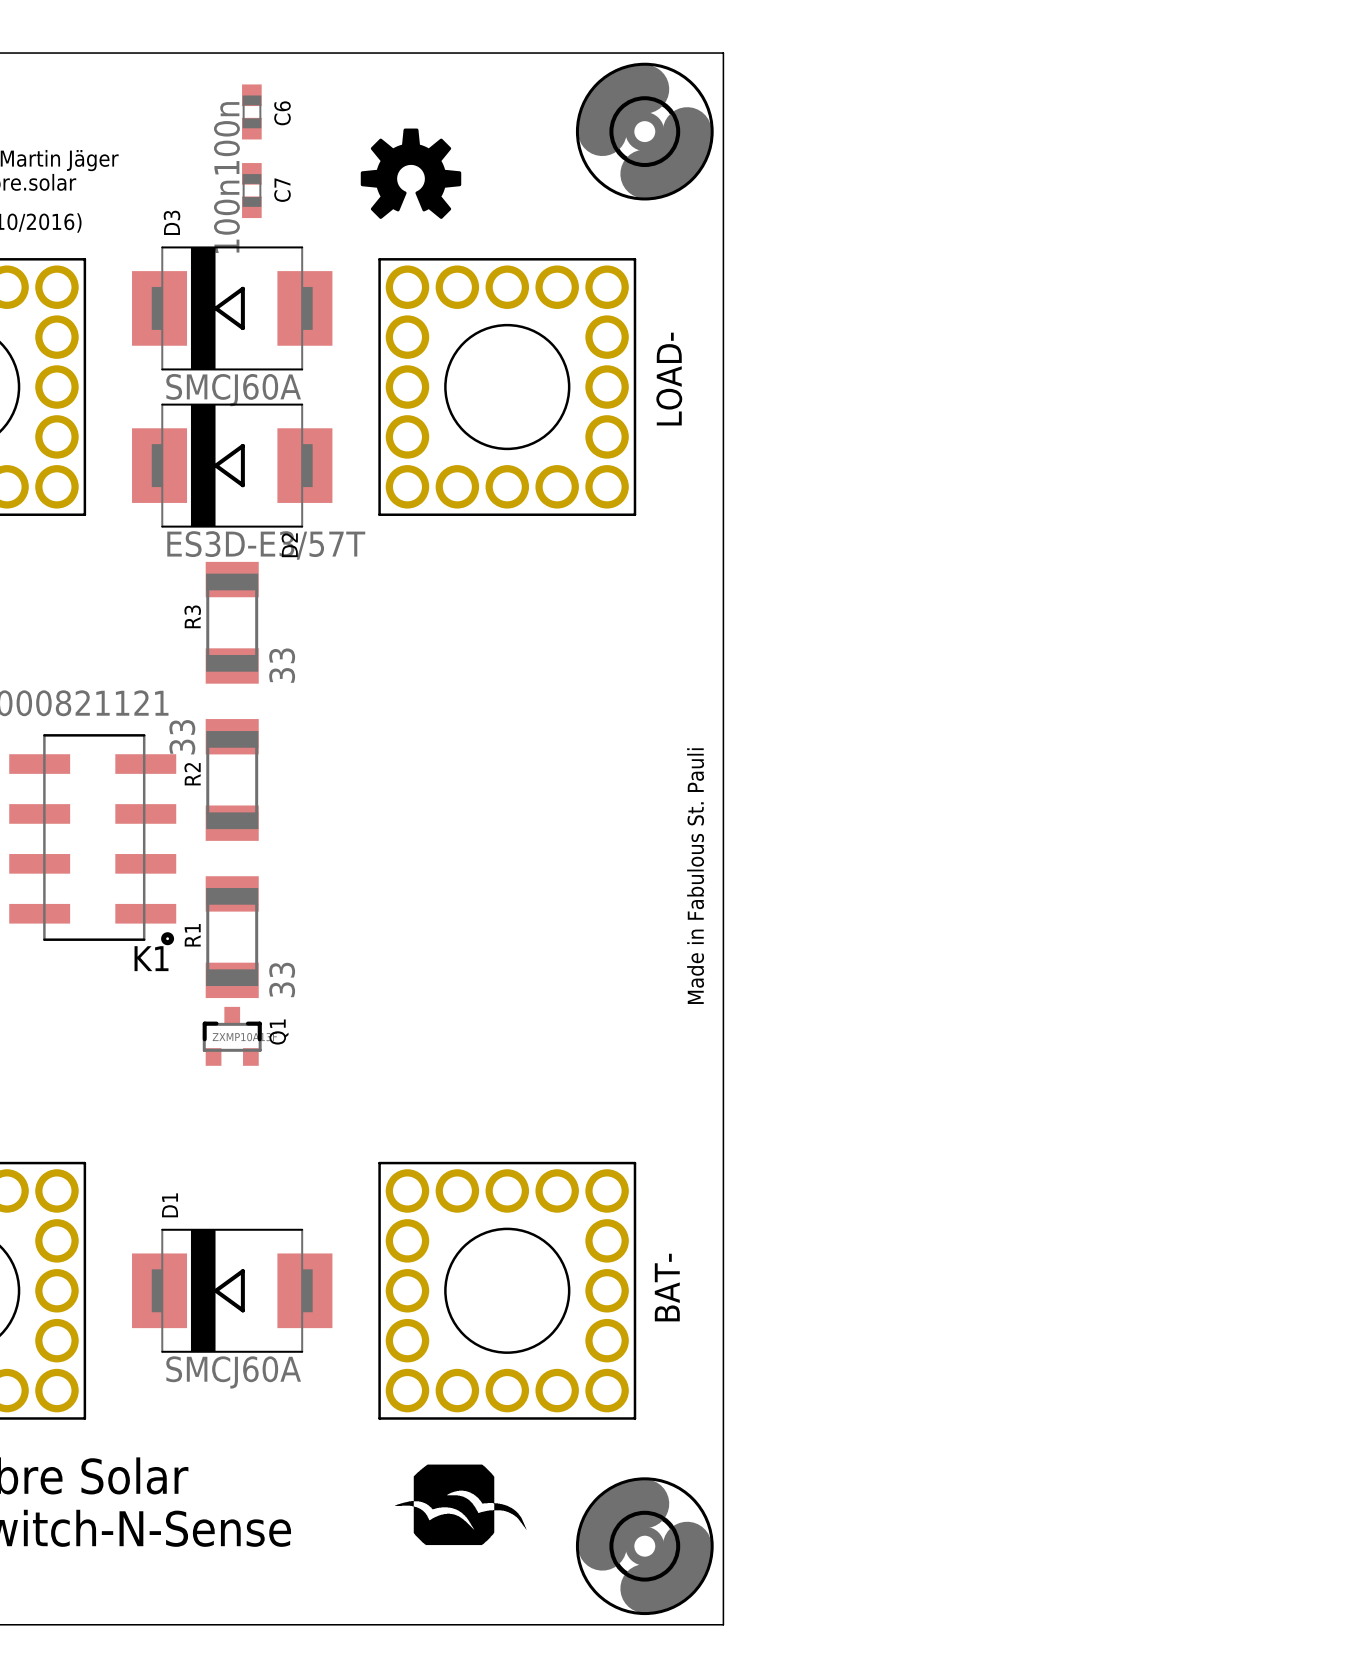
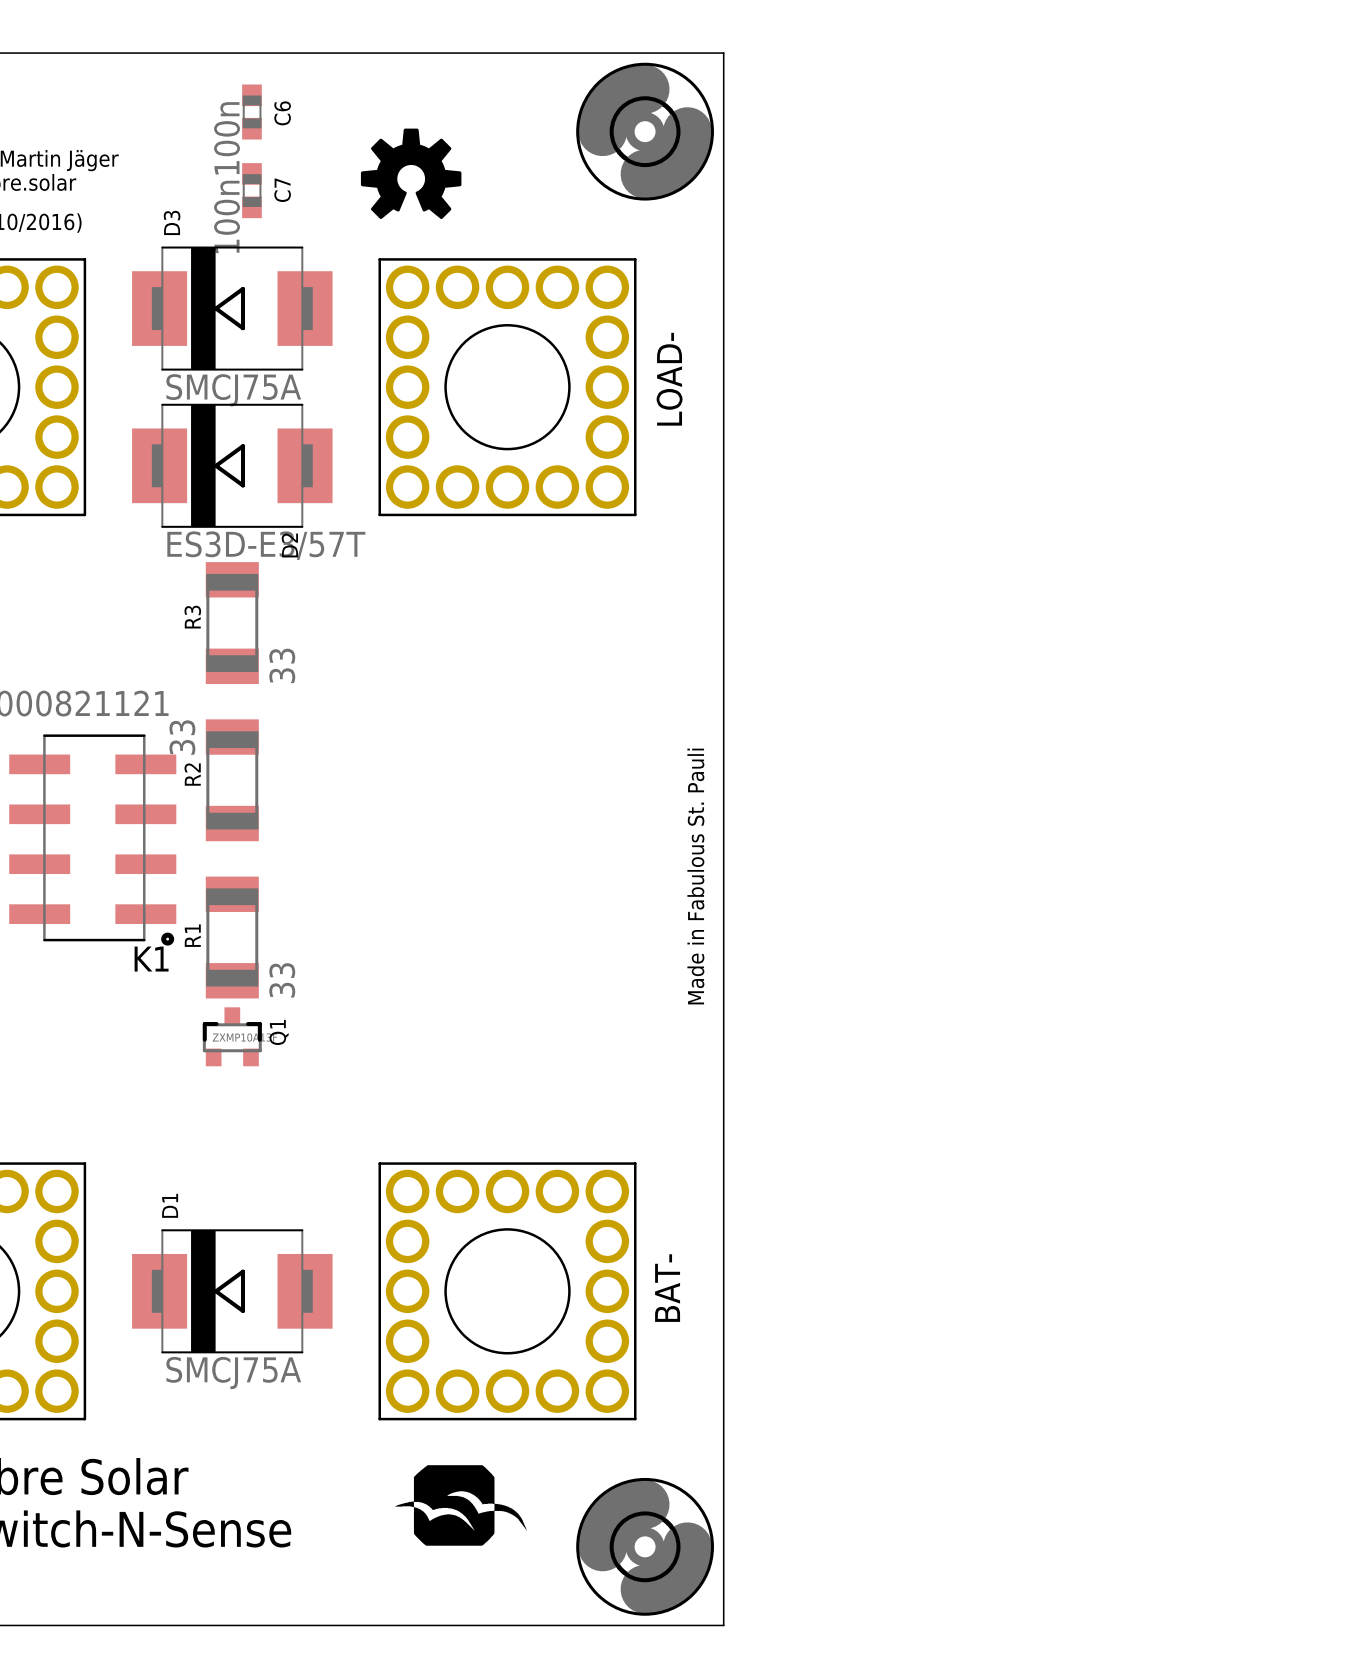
D3 value: SMCJ60A (233, 390) -> SMCJ75A (233, 390)
D1 value: SMCJ60A (233, 1372) -> SMCJ75A (233, 1373)

